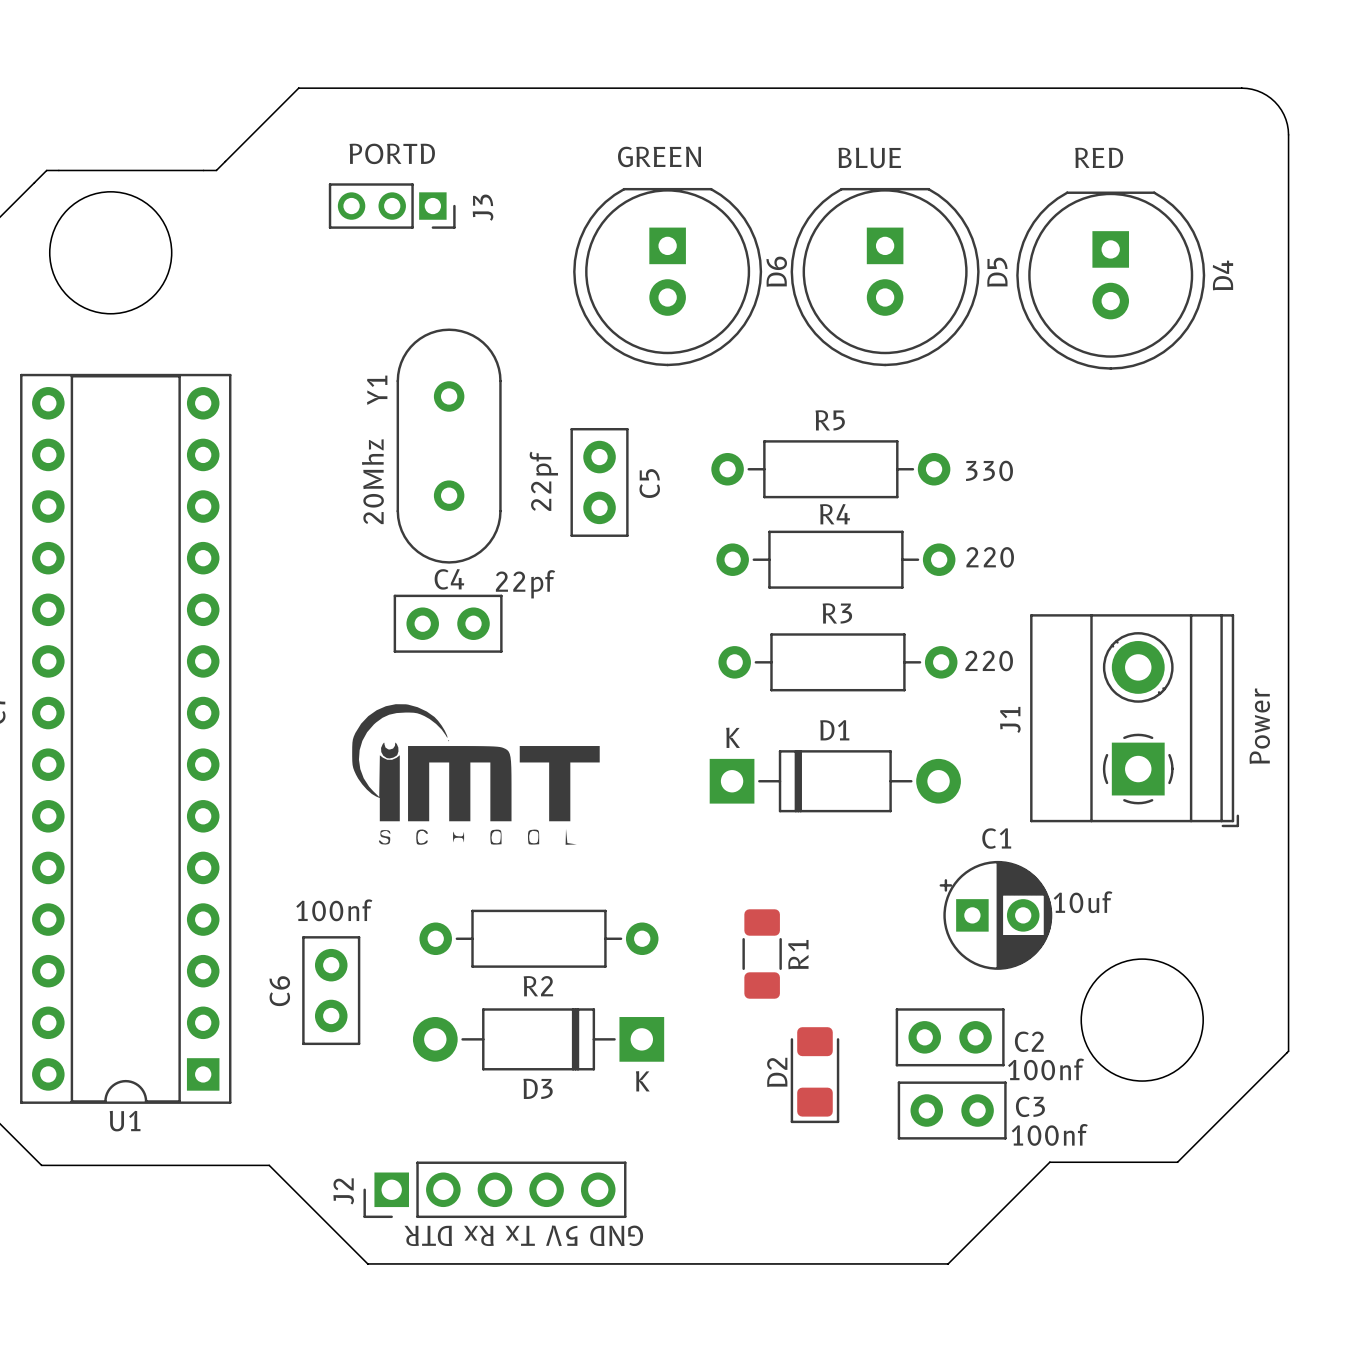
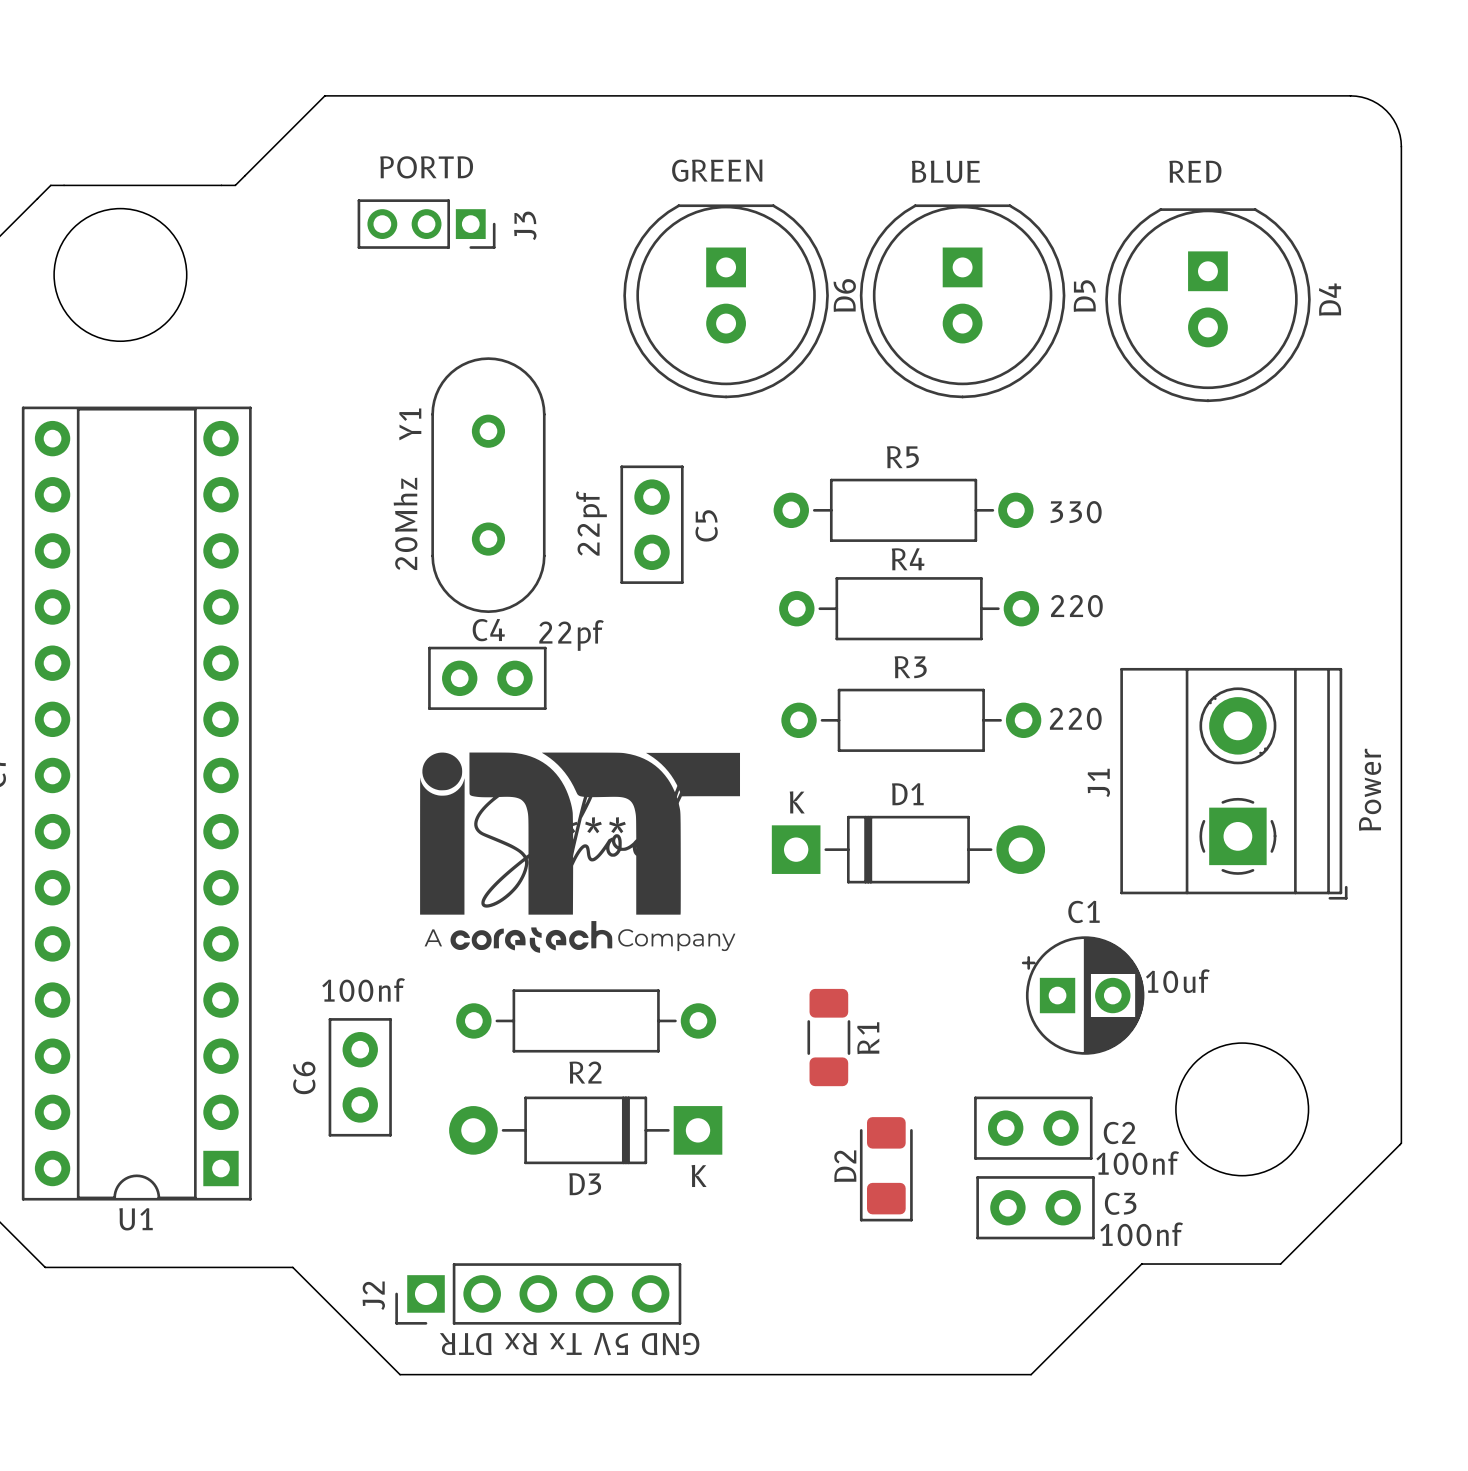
drawing: [352, 704, 600, 845] -> none
part: none -> (580, 852)

